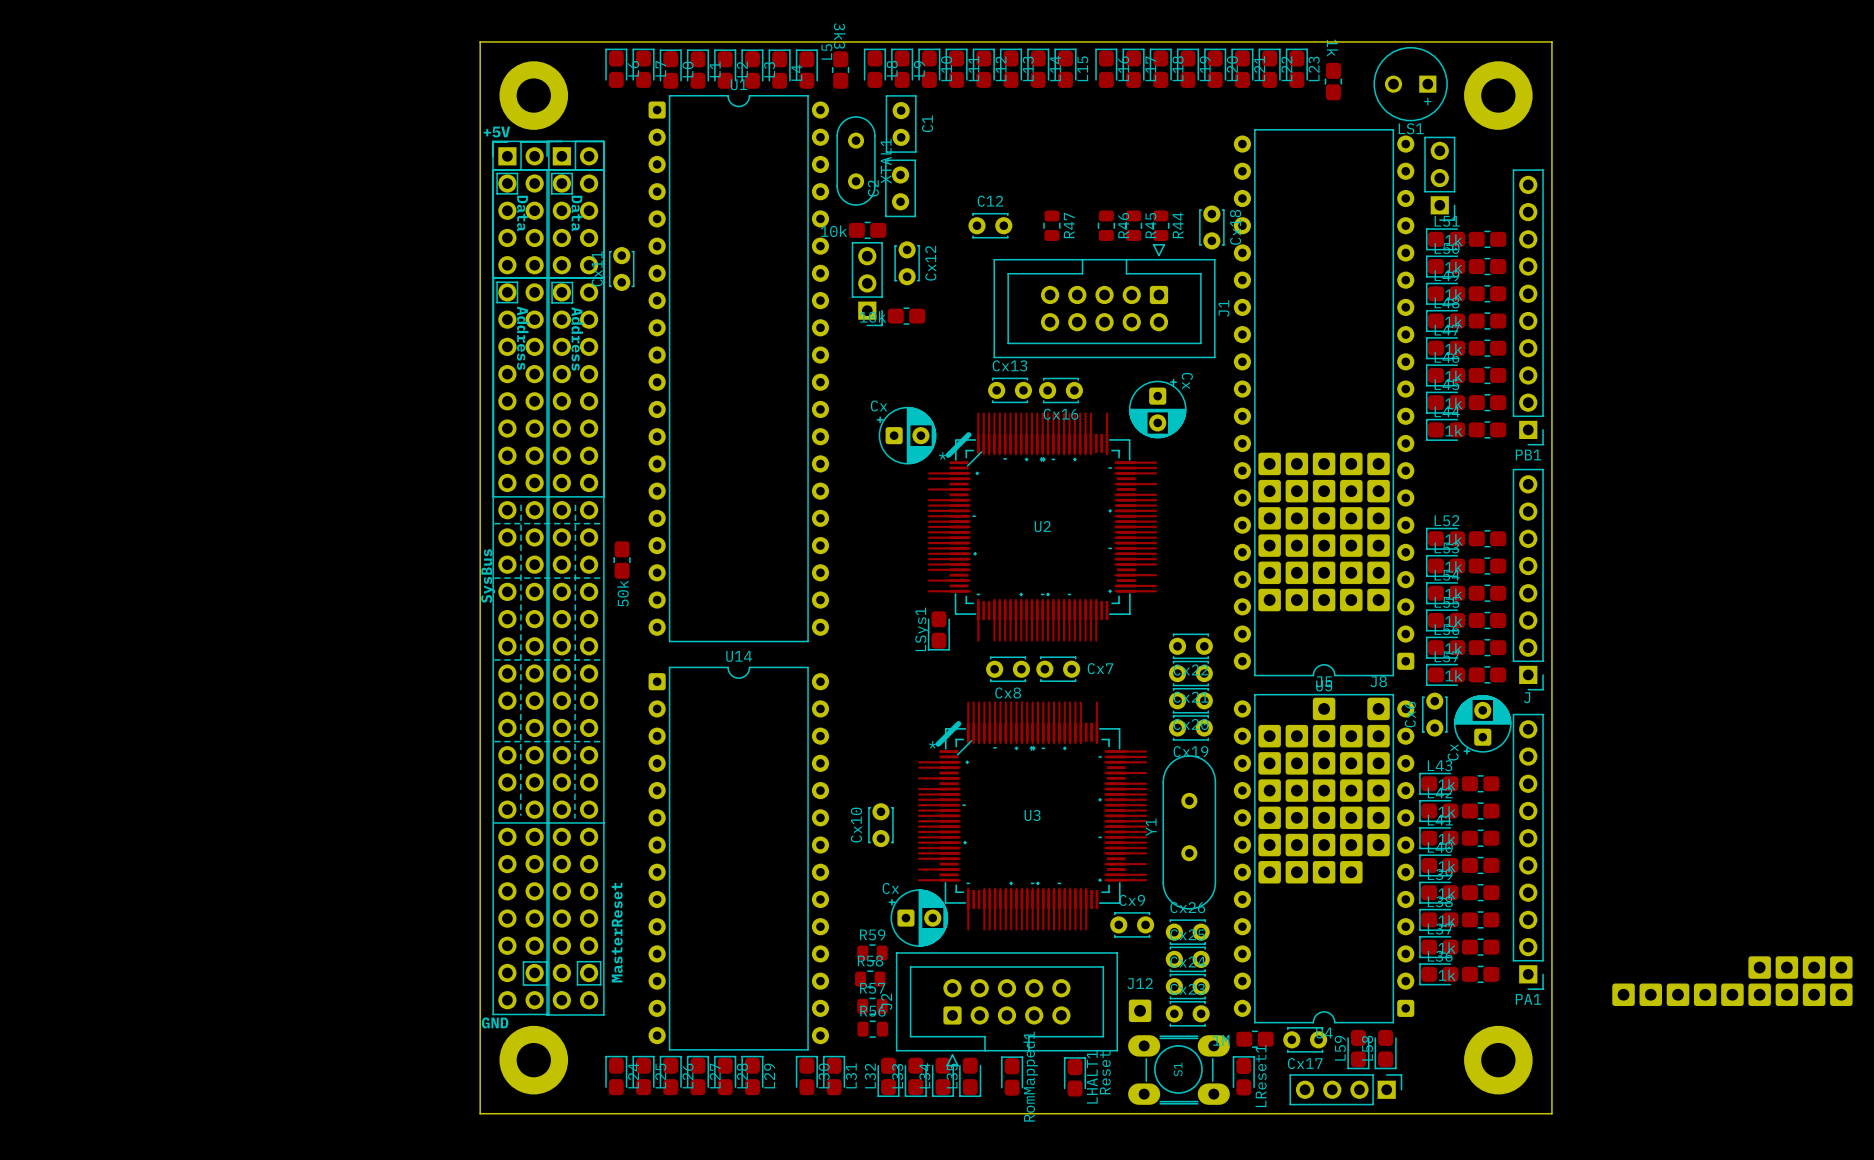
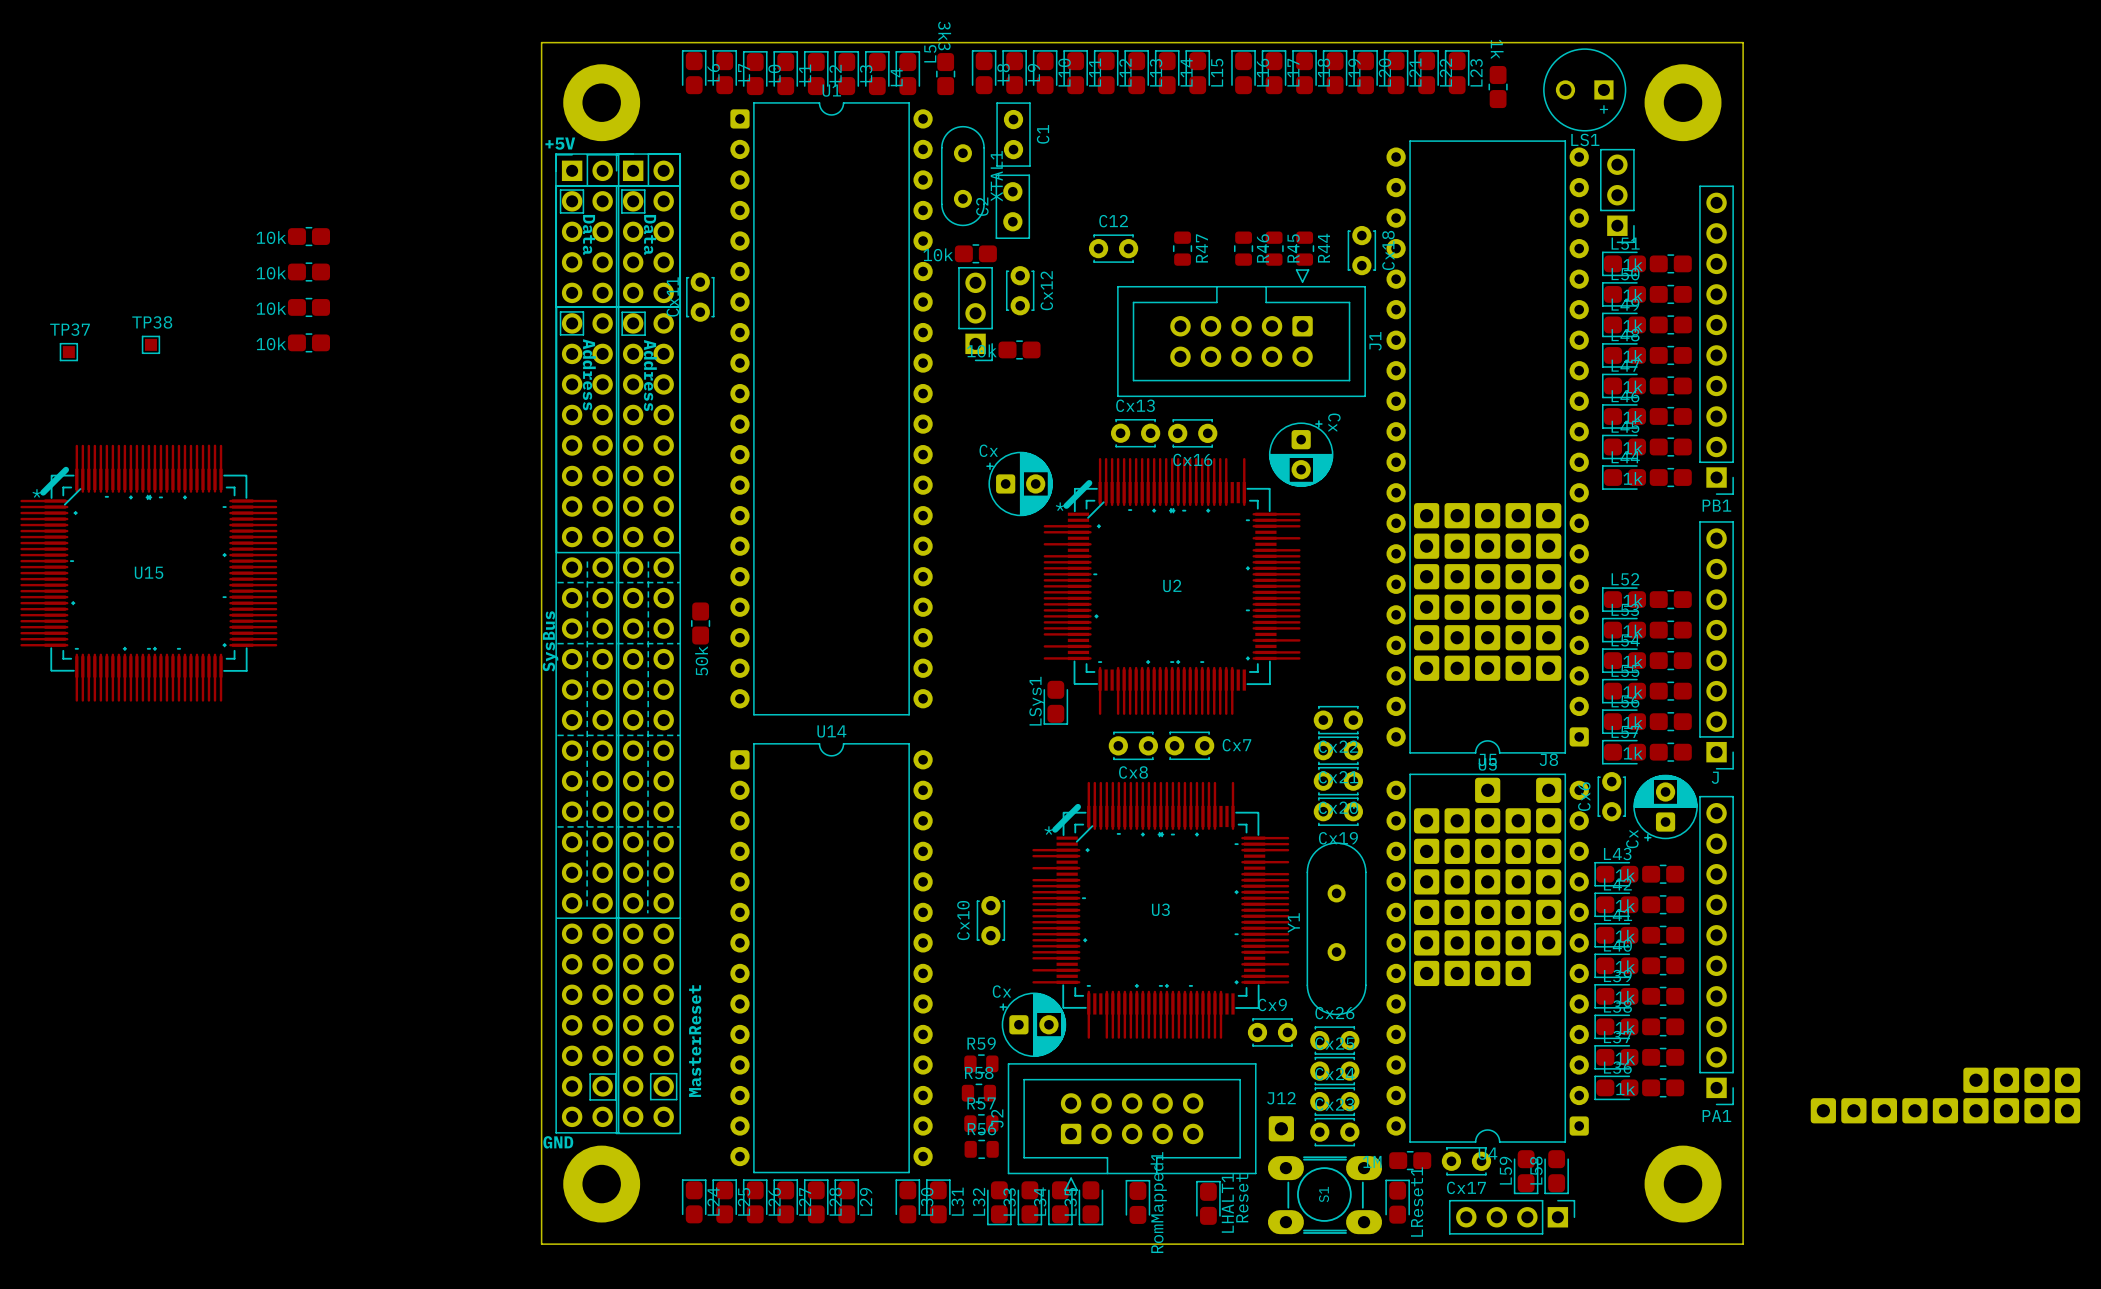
part: none -> 10k (308, 236)
part: none -> 10k (308, 271)
part: none -> 10k (308, 307)
part: none -> 10k (308, 342)
TP38: none -> (150, 344)
TP37: none -> (68, 352)
U15: none -> (148, 573)

